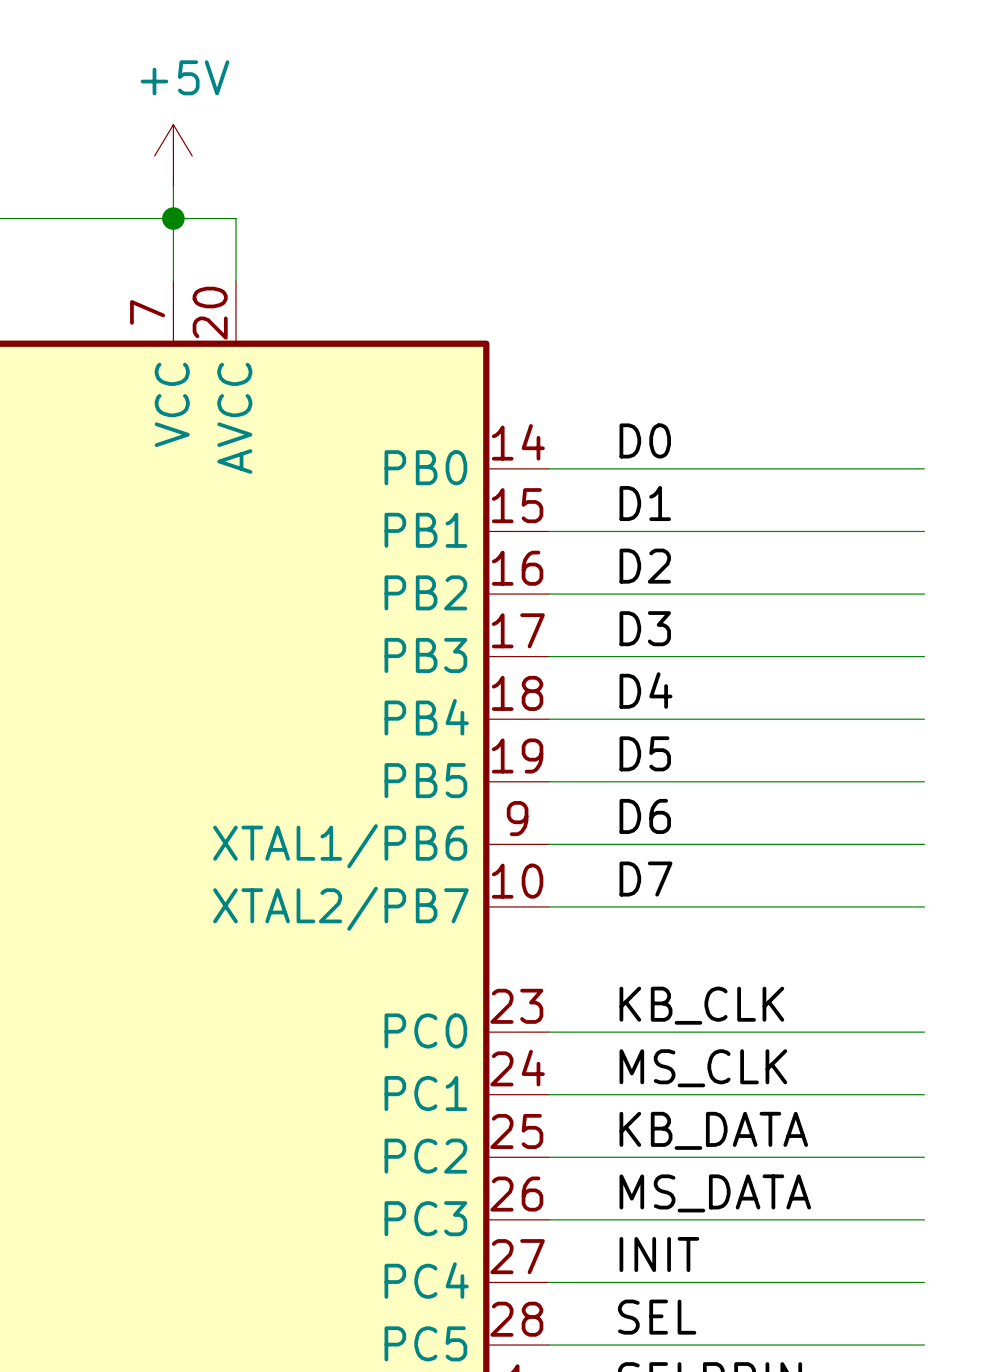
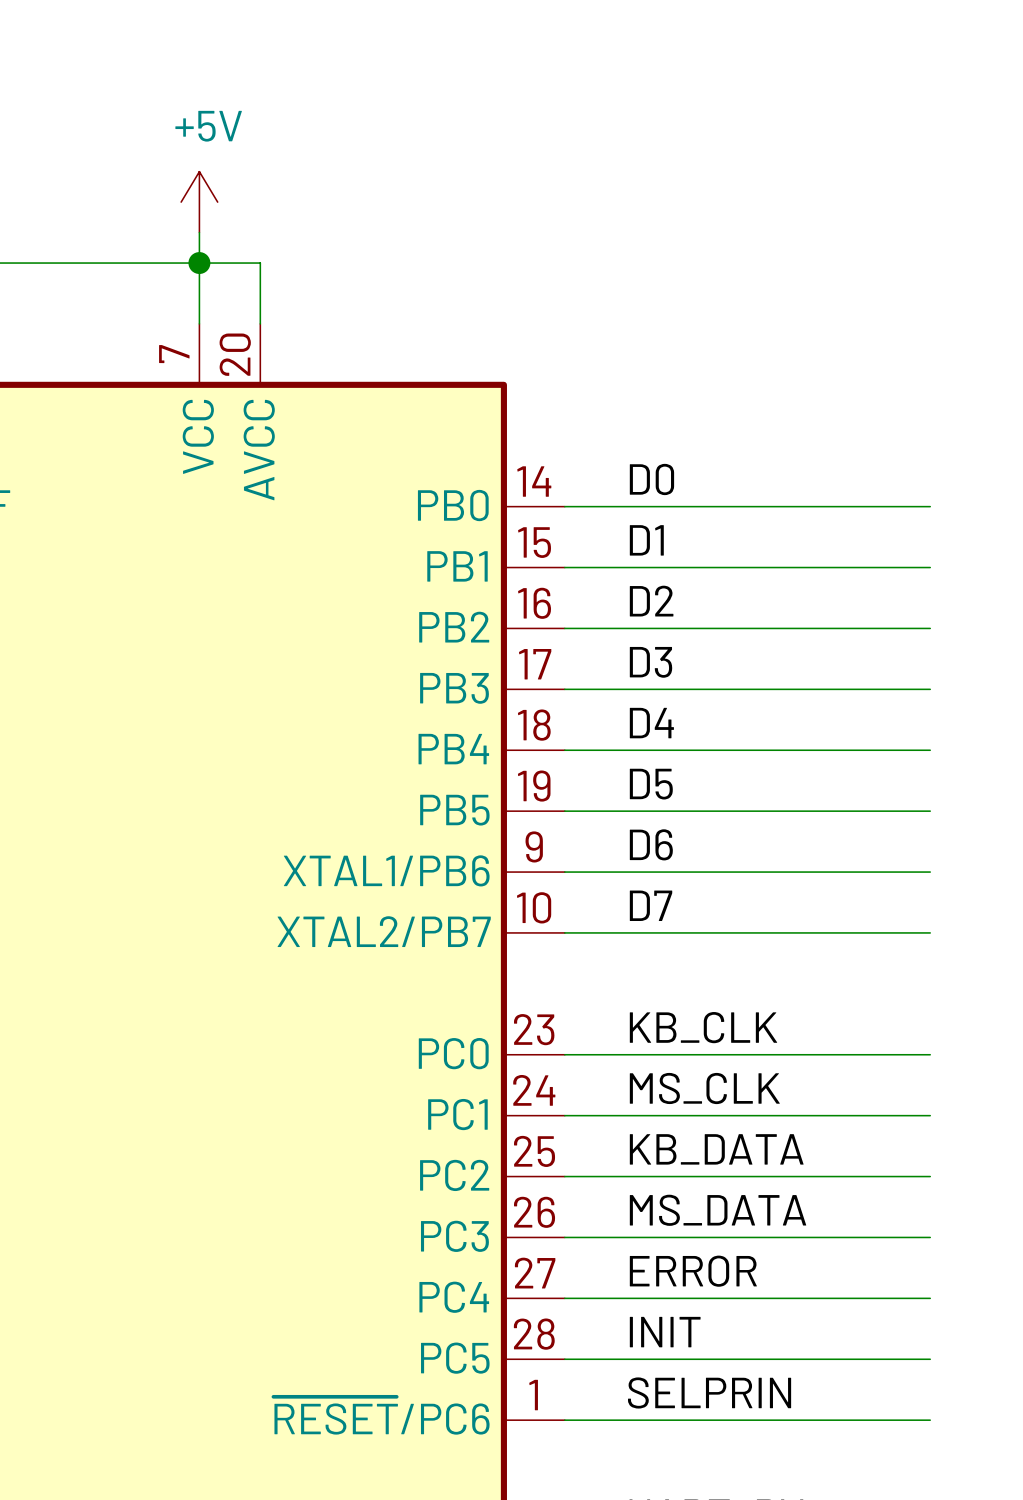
label: INIT (659, 1254) -> ERROR (693, 1271)
label: SEL (657, 1317) -> INIT (665, 1332)

